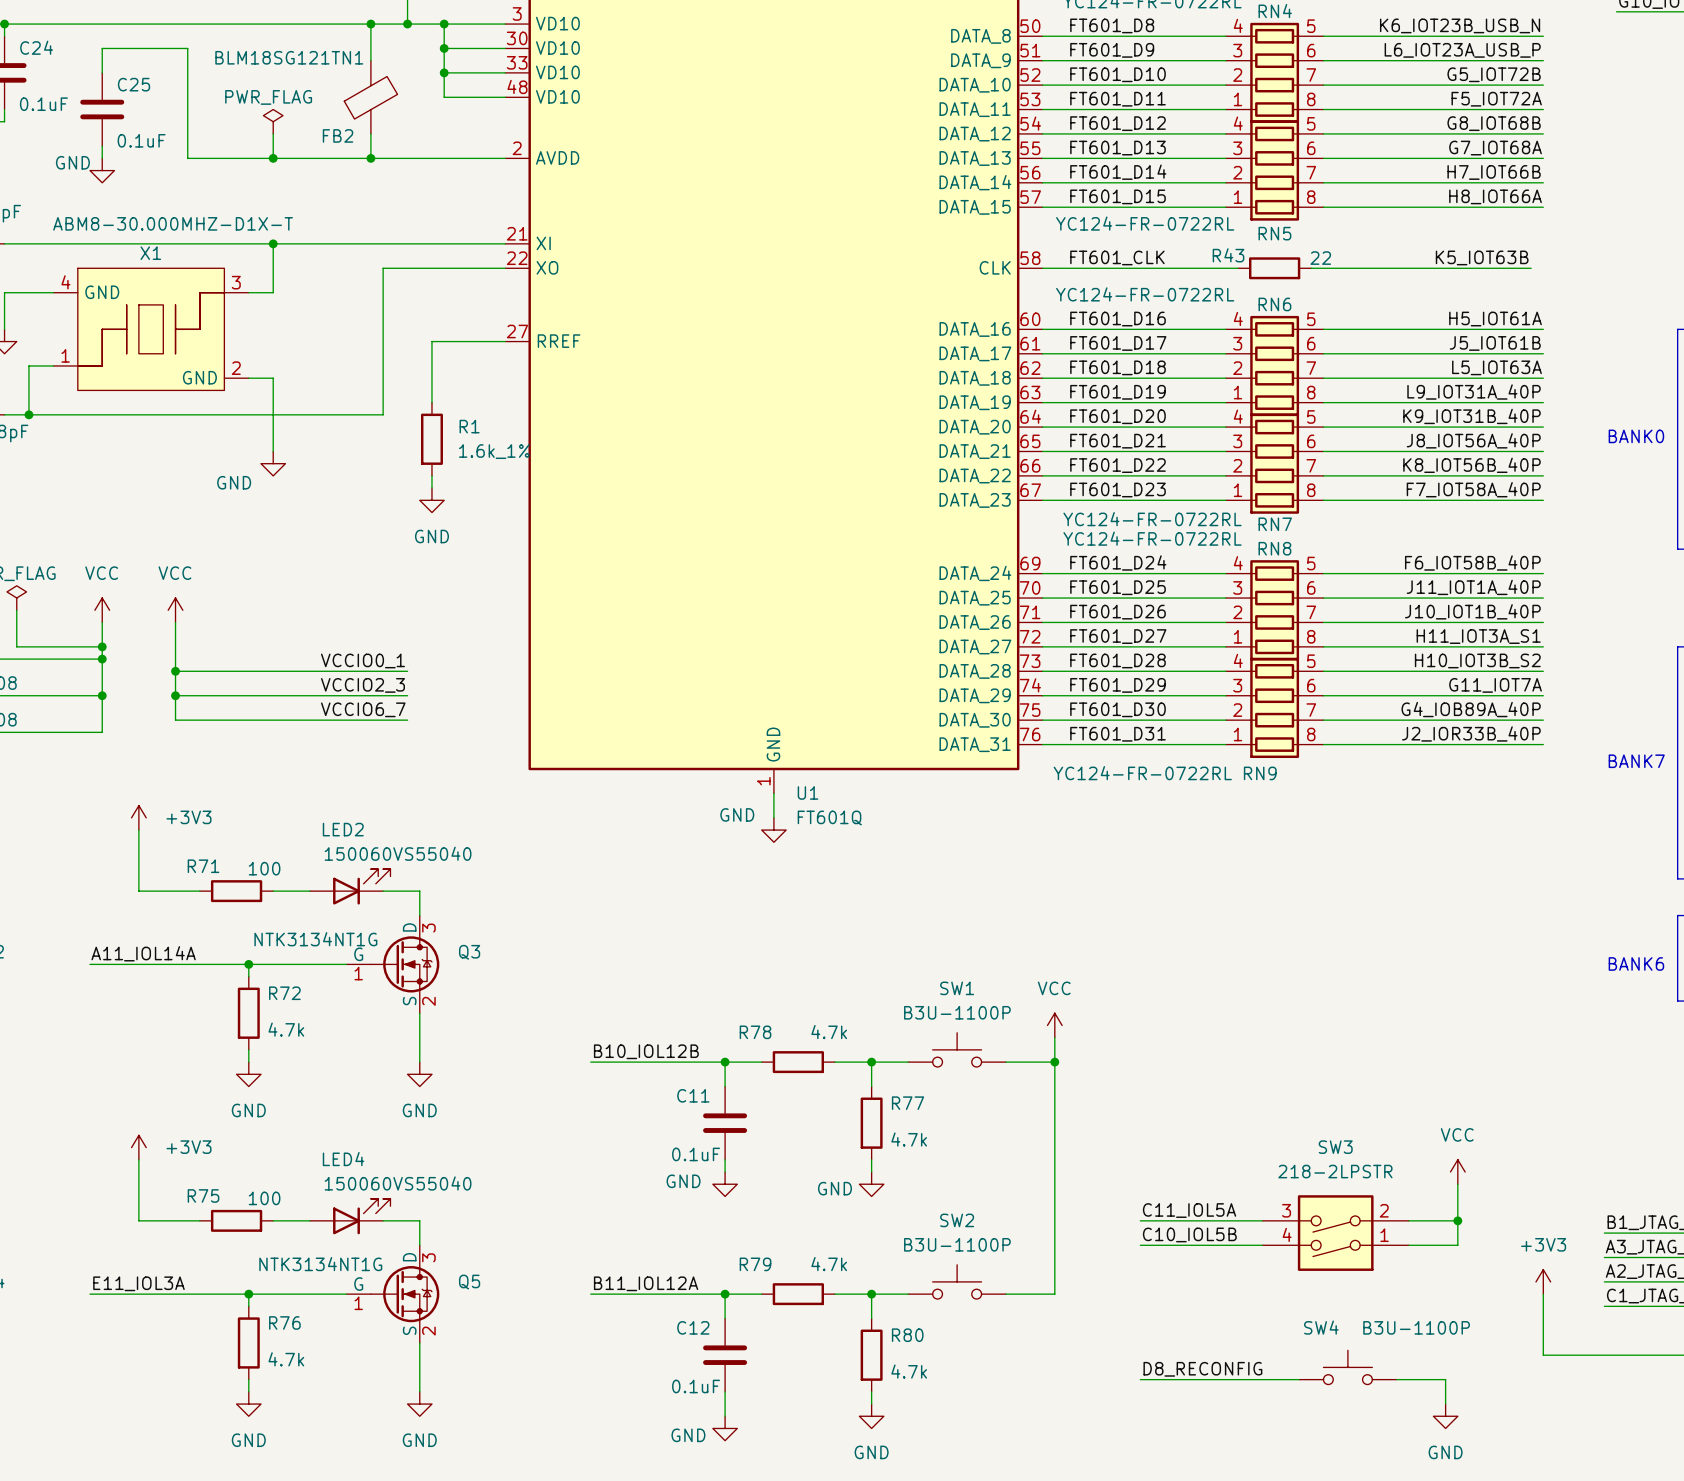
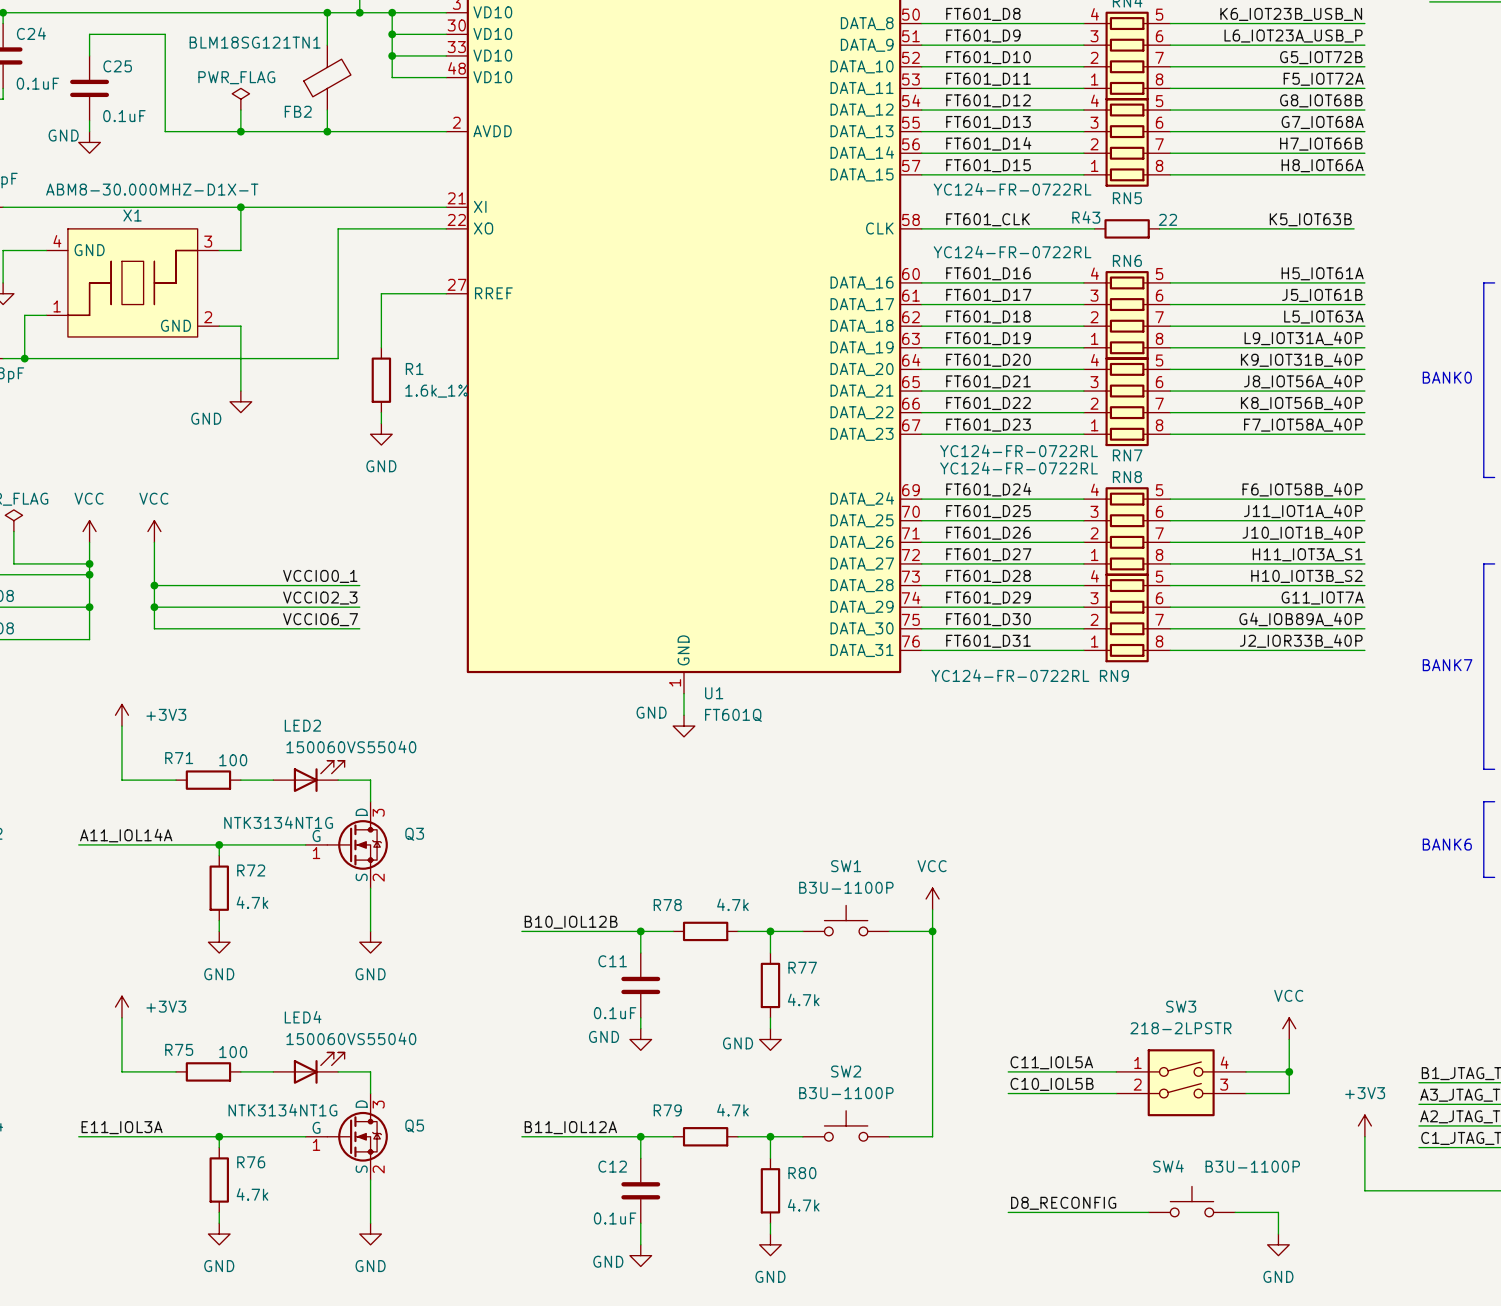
SW3 rotation: 0° (1335, 1233) -> 180° (1181, 1082)

